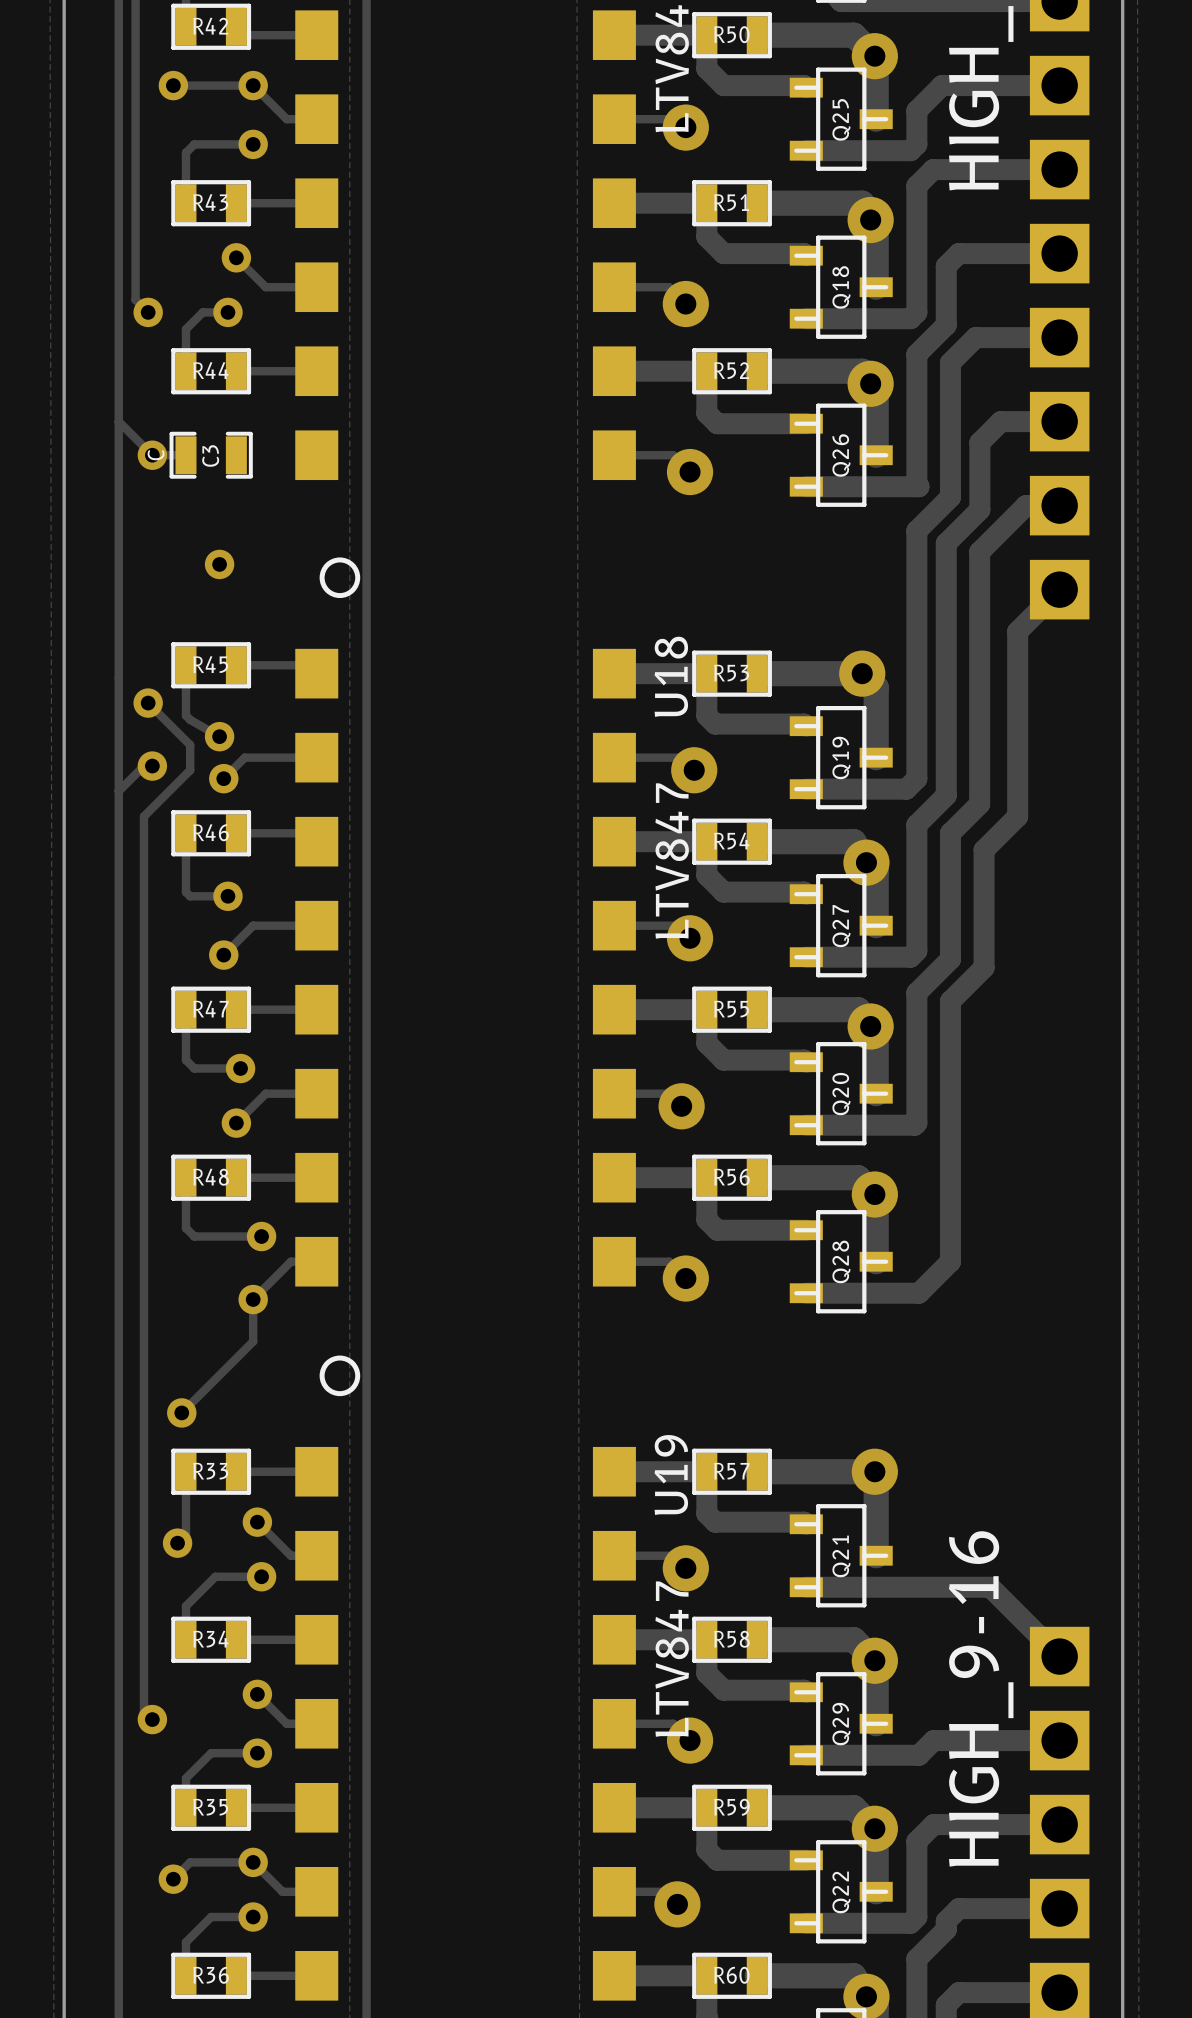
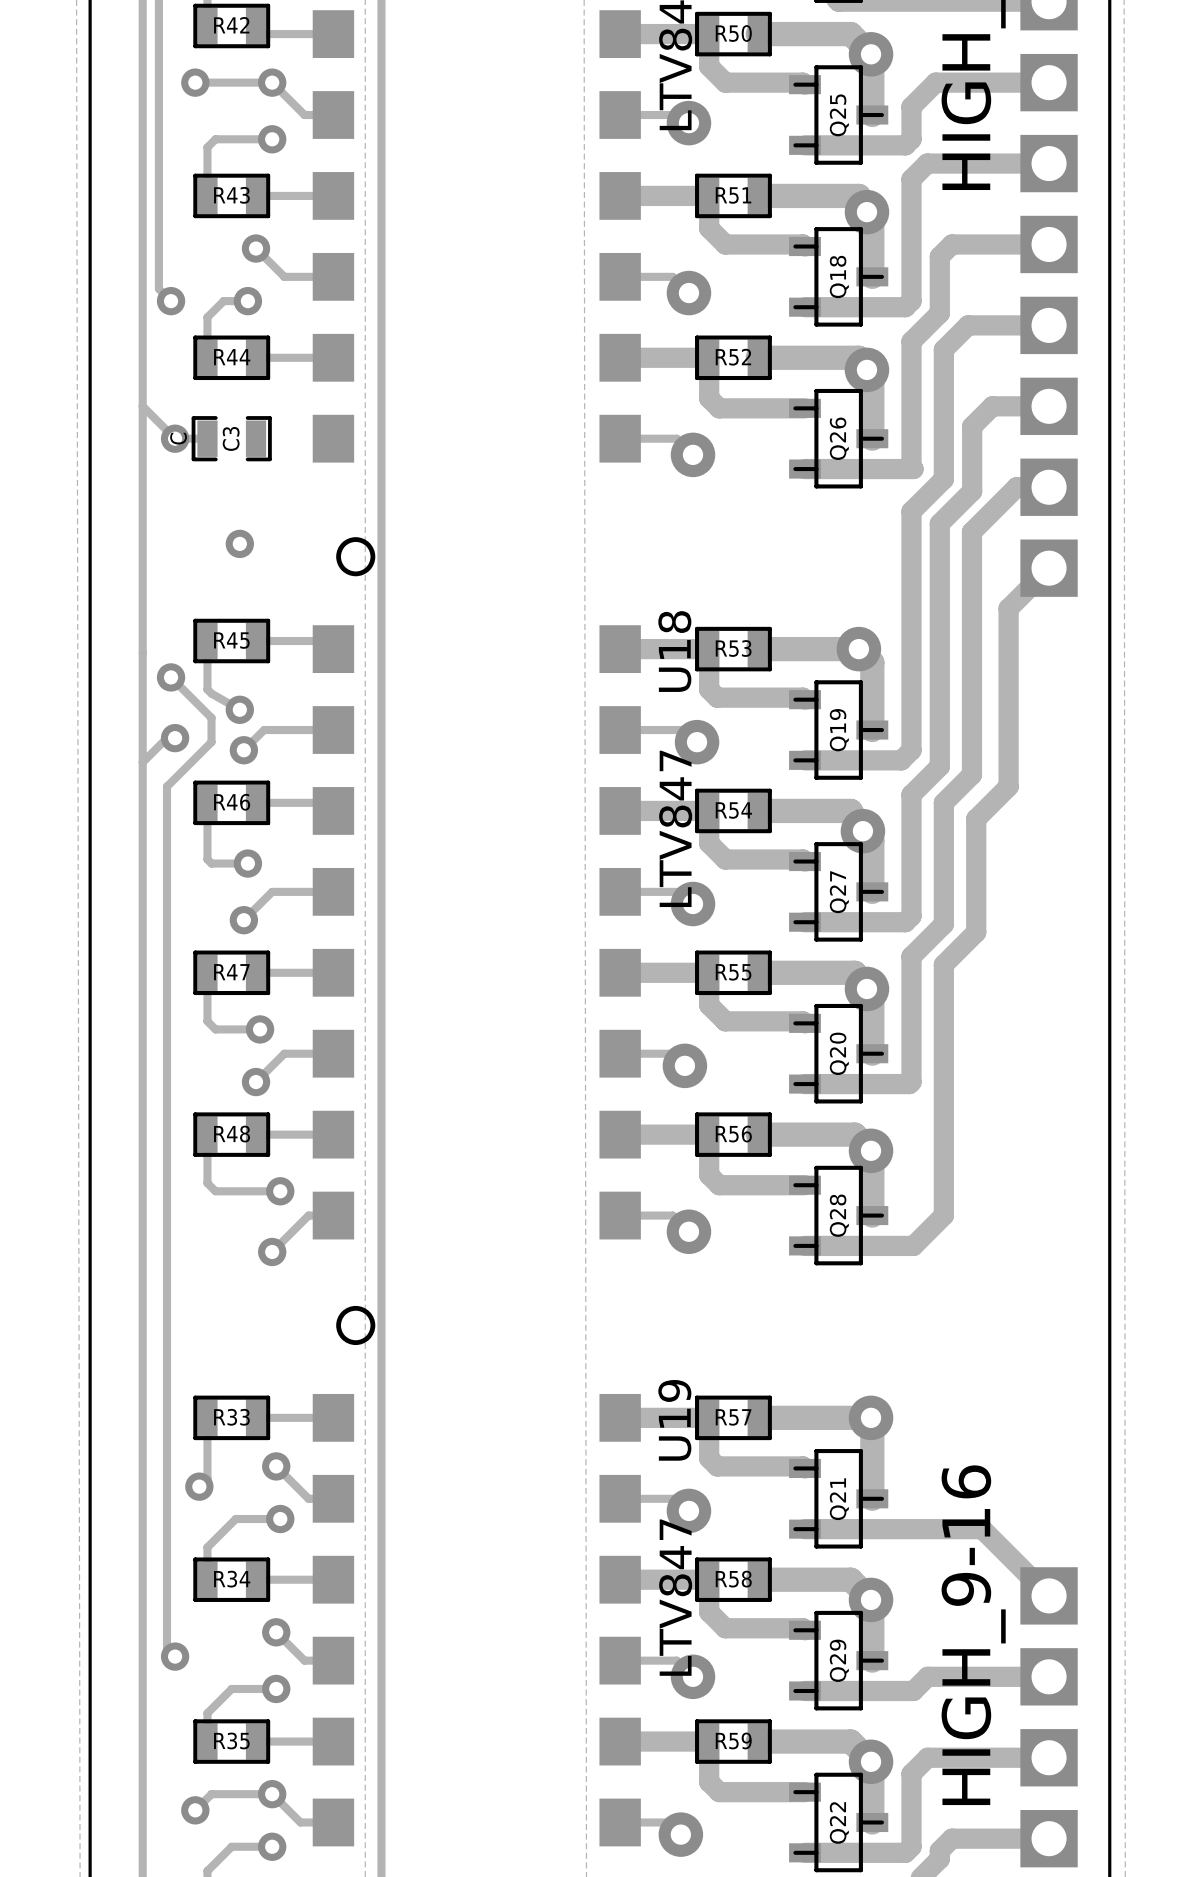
track: (253, 1299) (253, 1341) (181, 1412) -> none
via: (181, 1412) -> none

